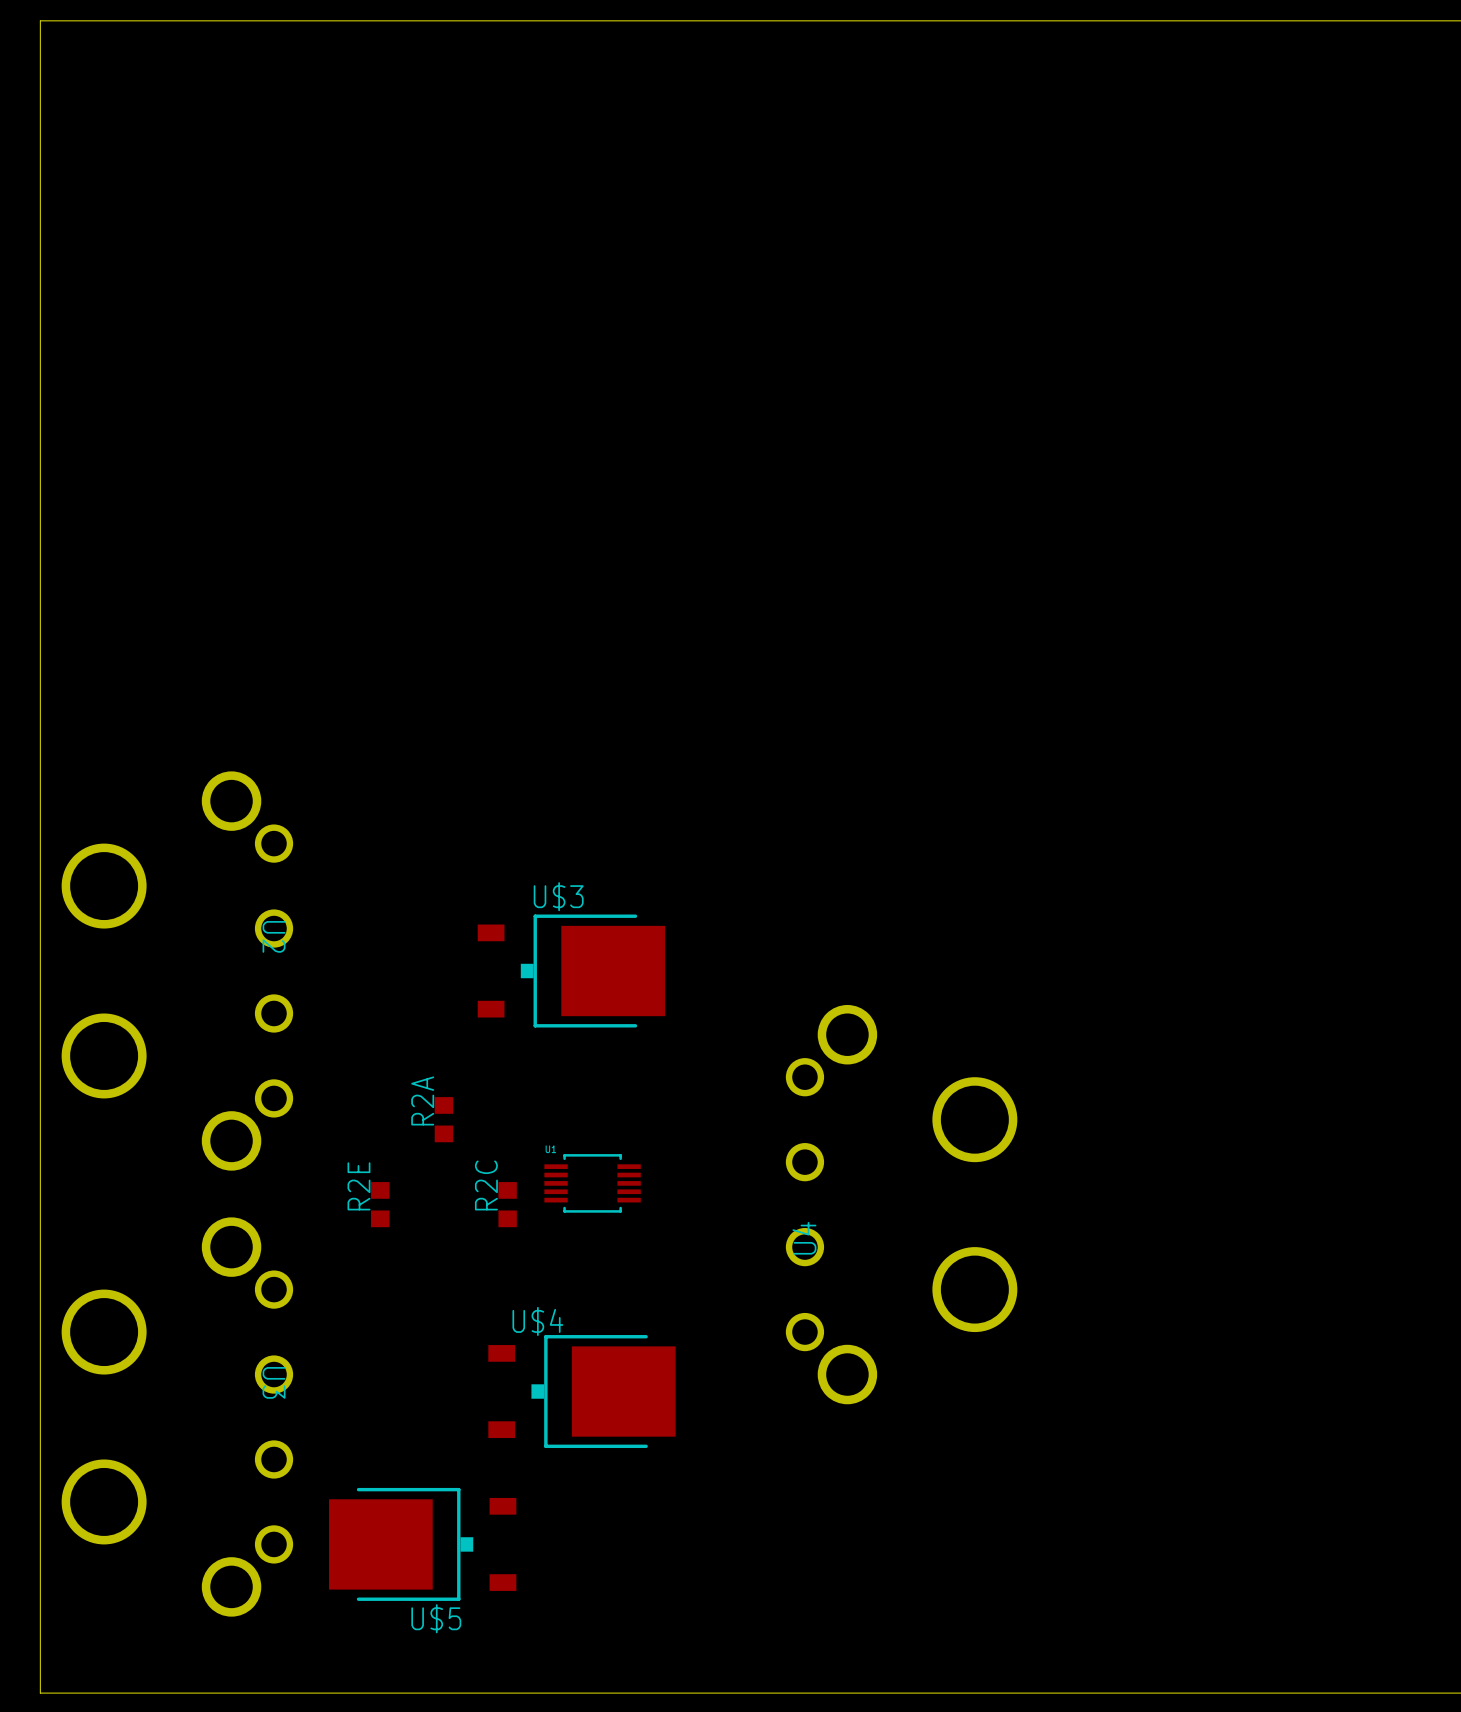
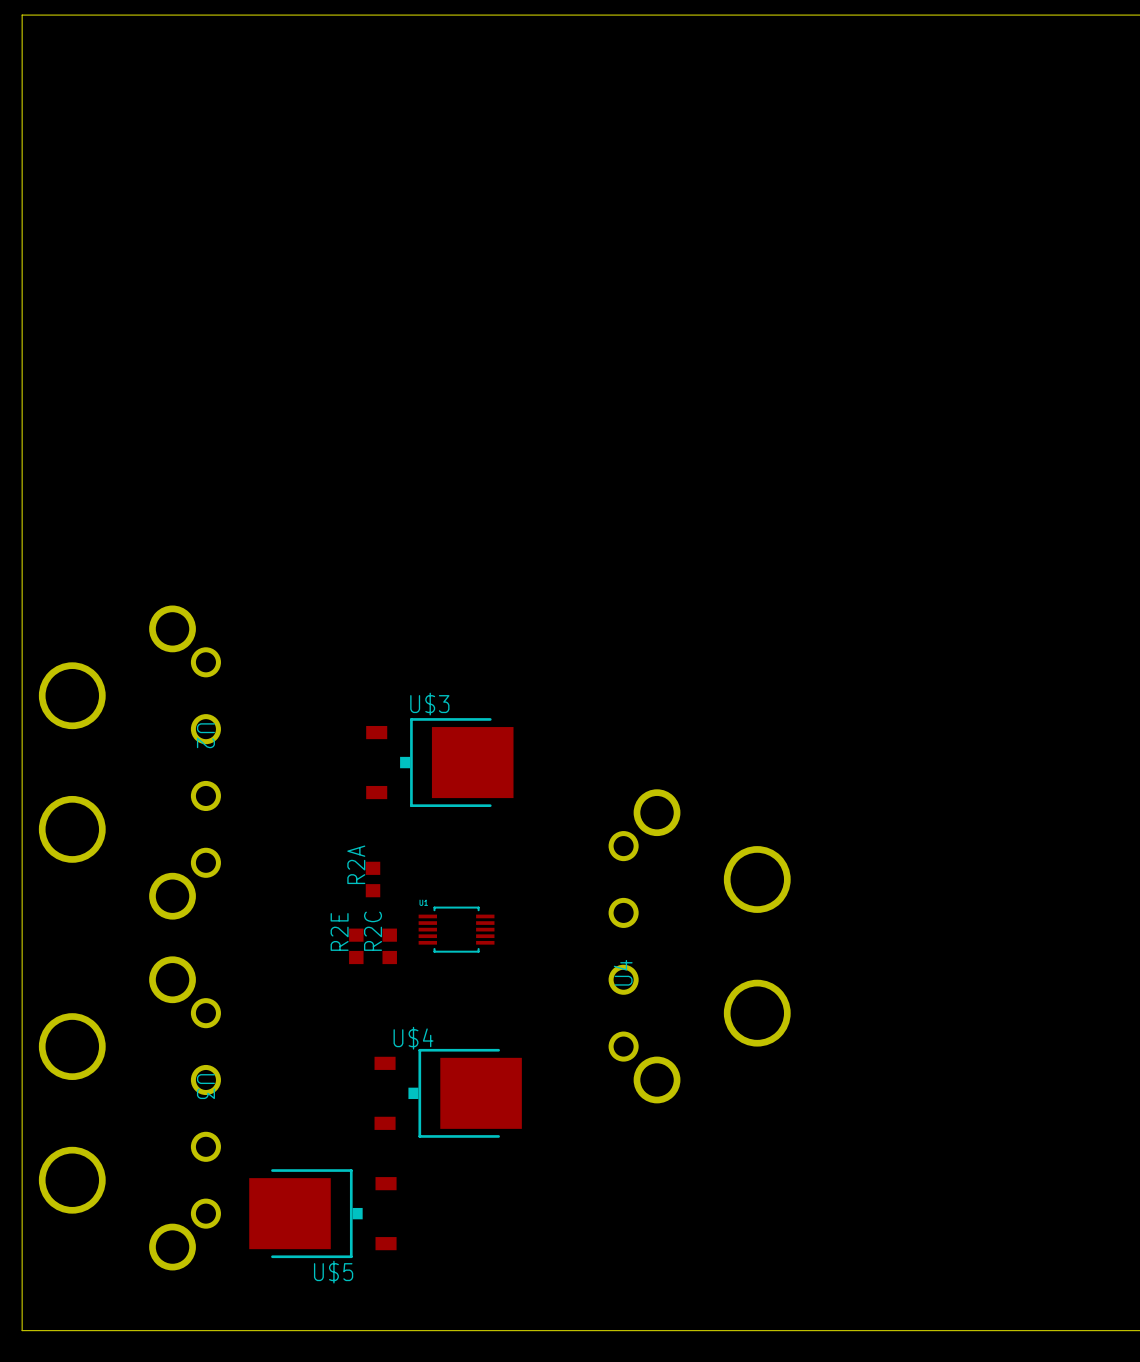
R2A position: (443, 1119) -> (373, 879)
R2E position: (380, 1204) -> (356, 946)

